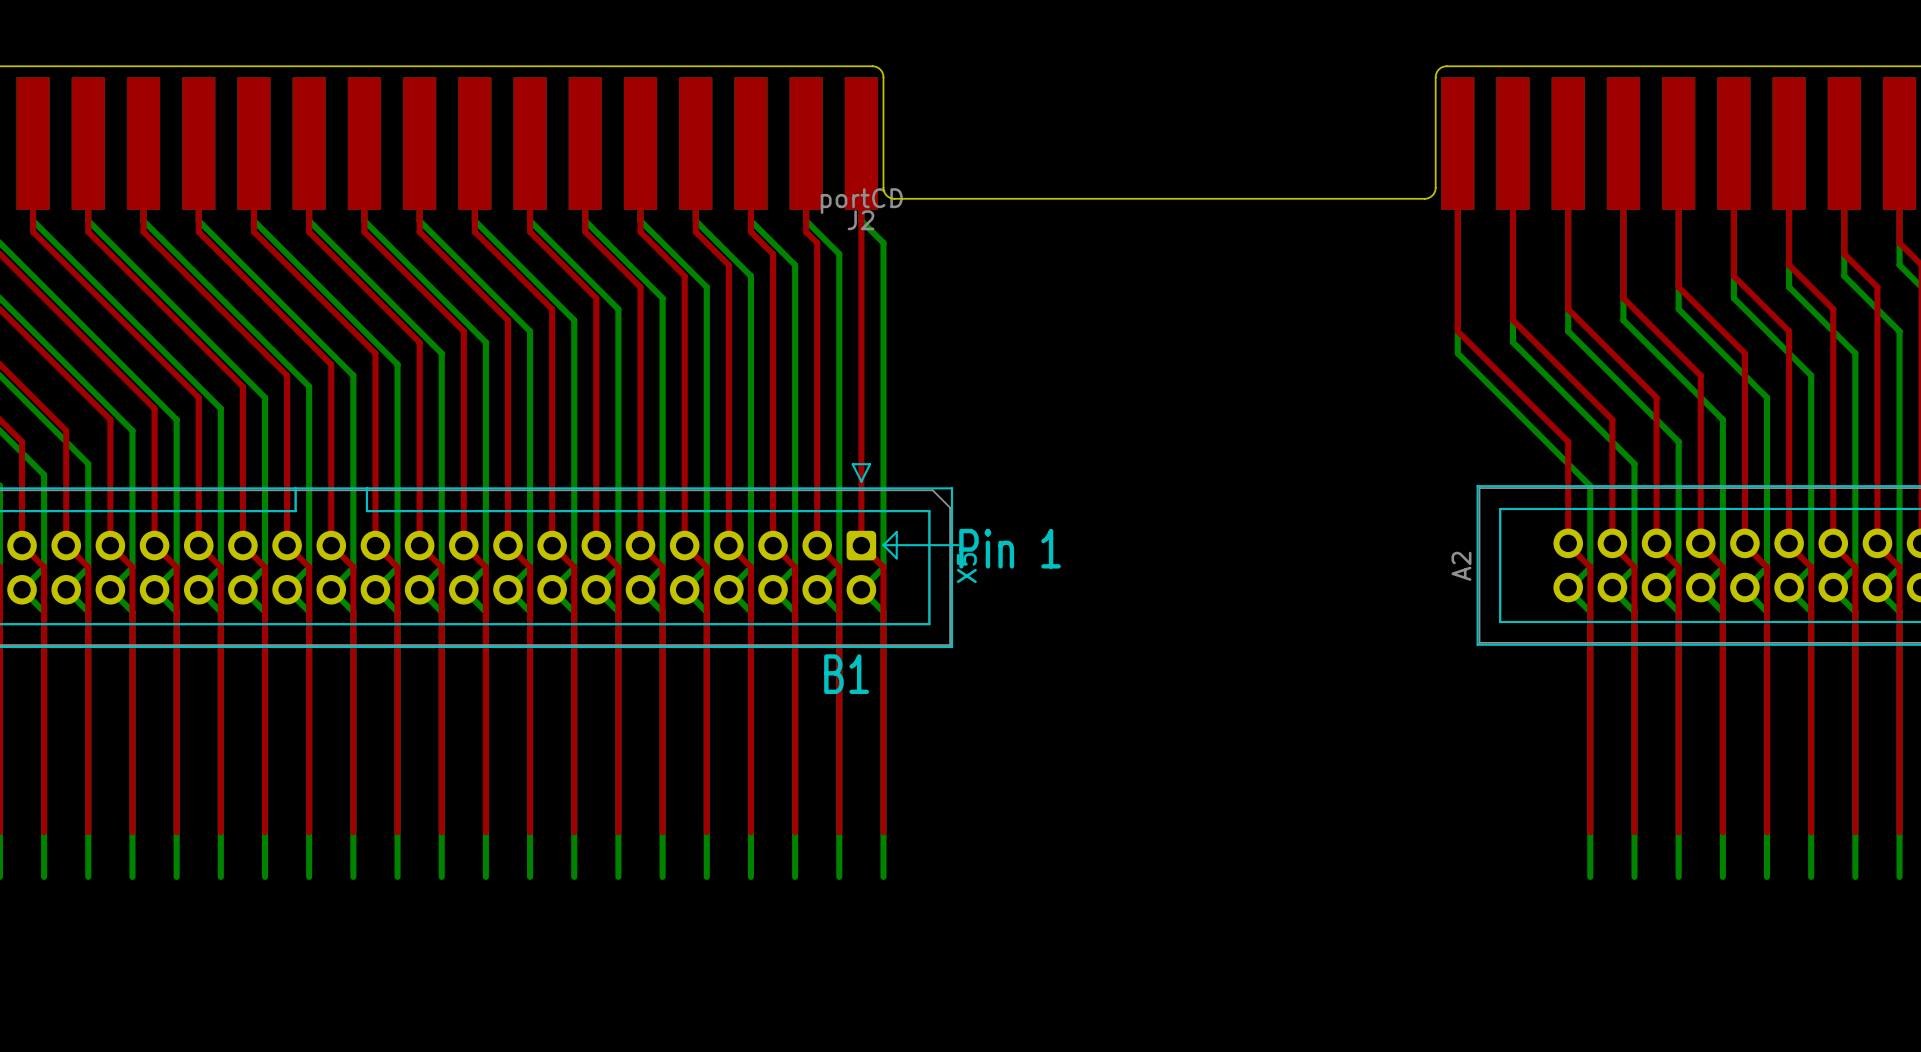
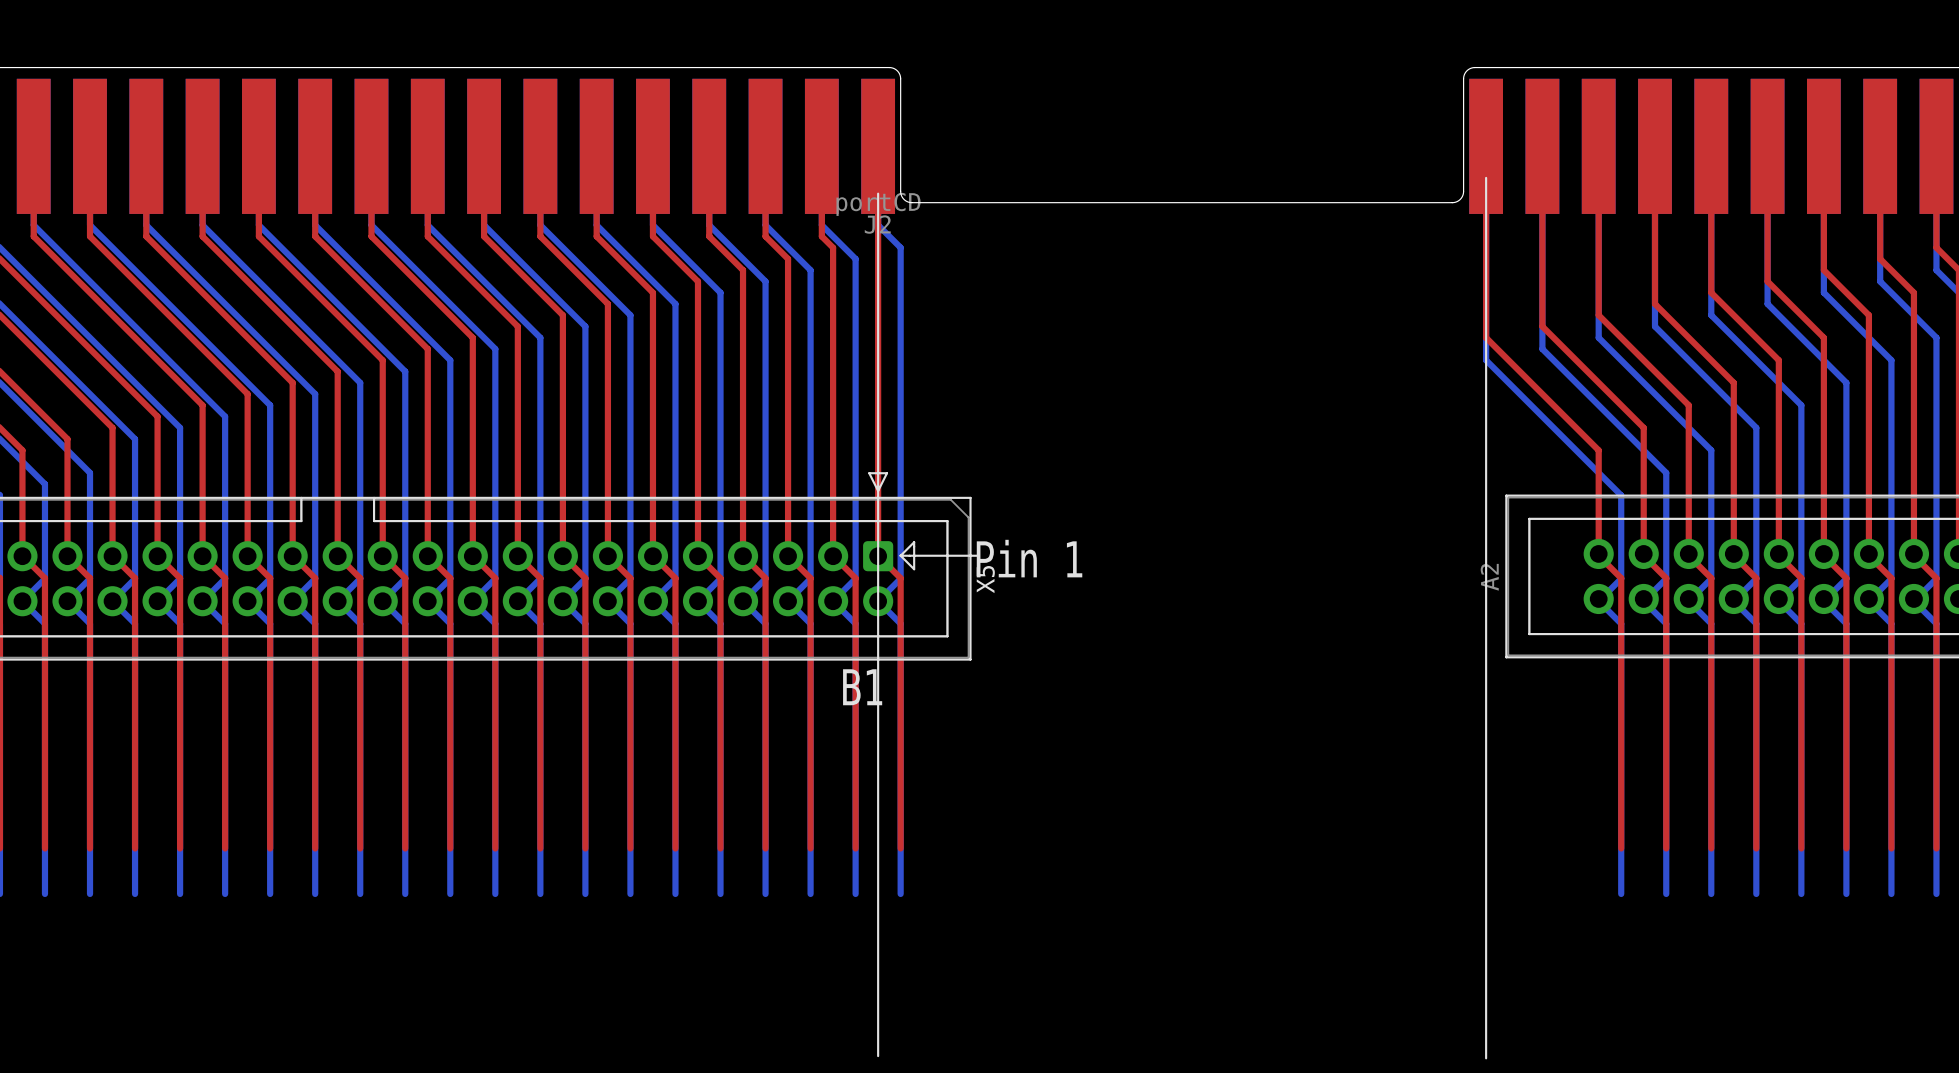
line: none -> (1486, 177) (1486, 1058)
line: none -> (878, 193) (878, 1056)

